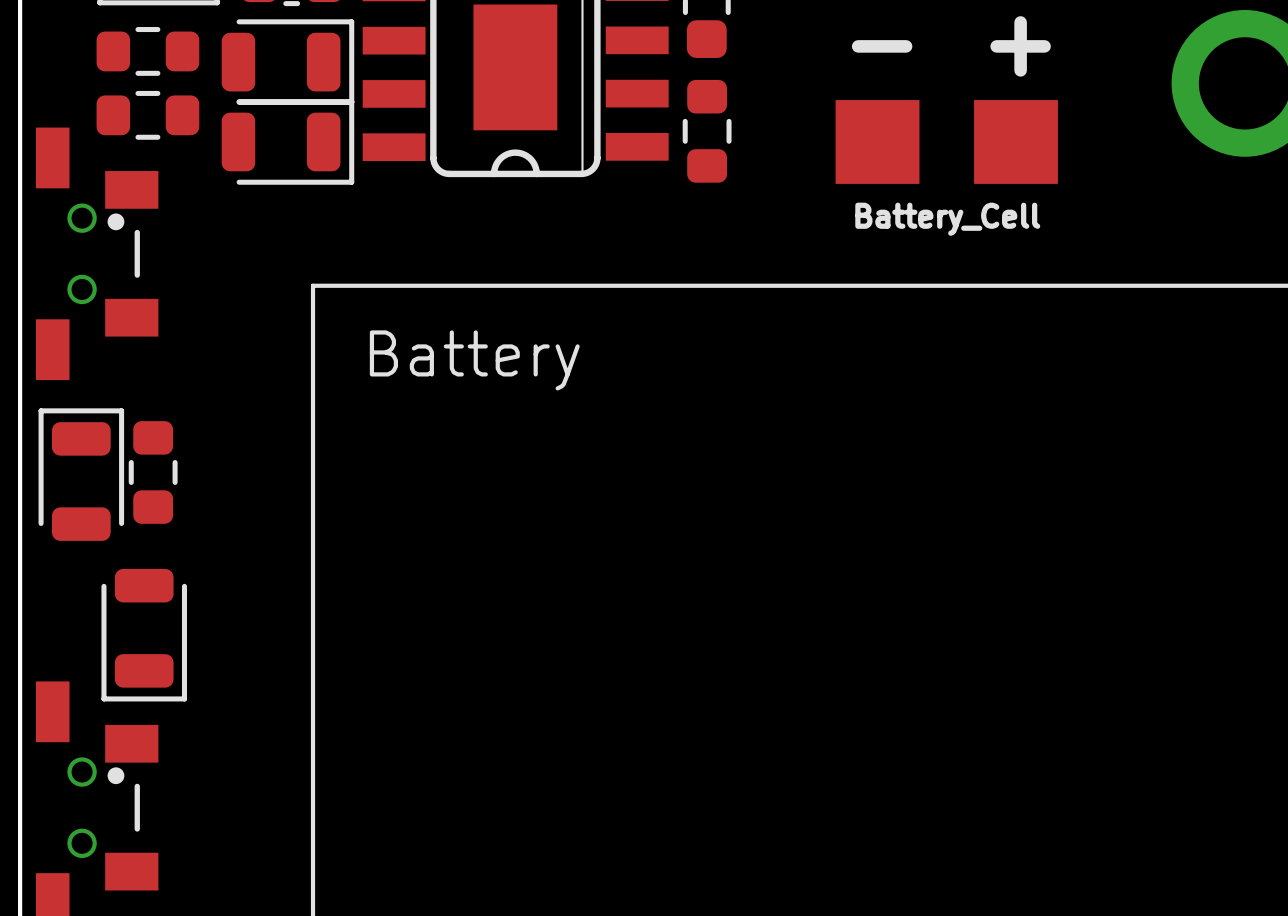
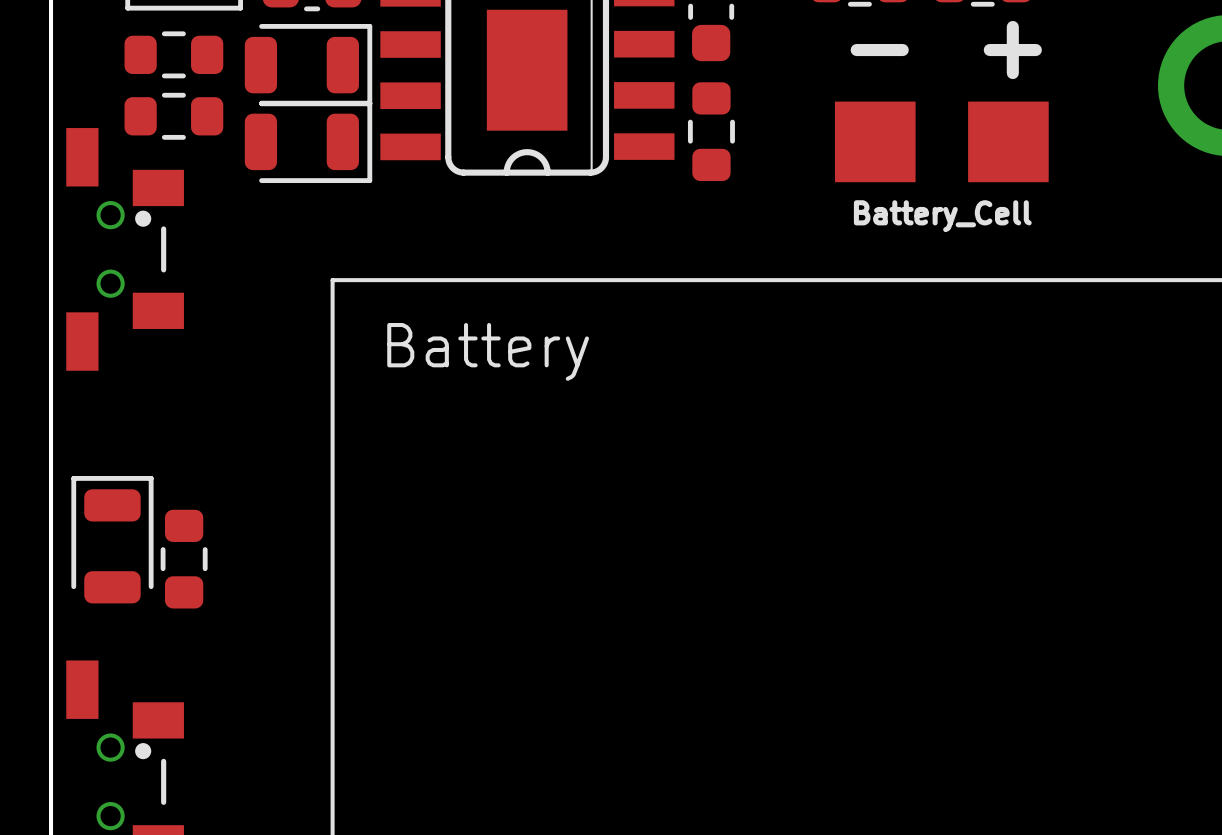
part position: (153, 472) -> (184, 559)
part: (81, 474) -> none
part: none -> (112, 539)
part: (144, 635) -> none

